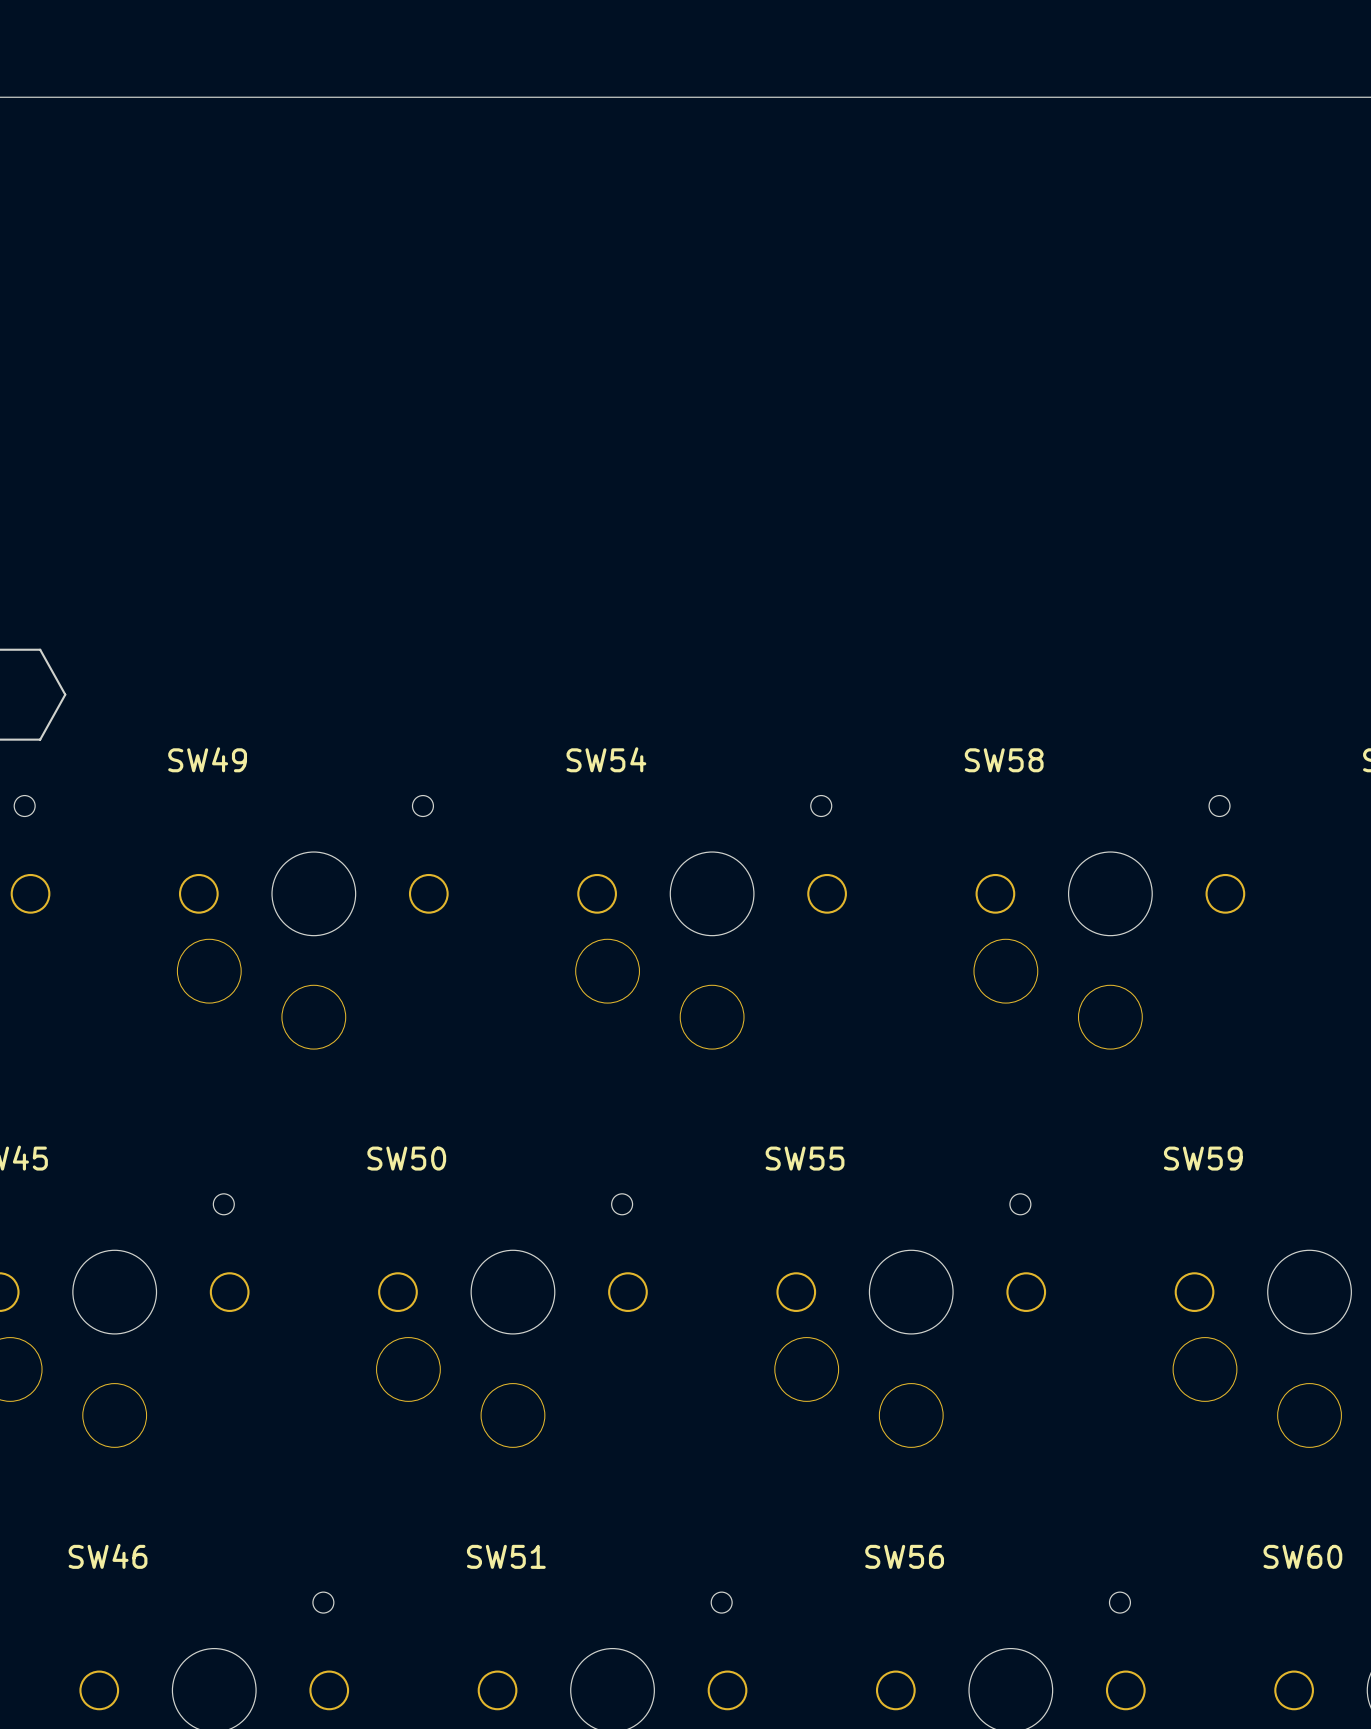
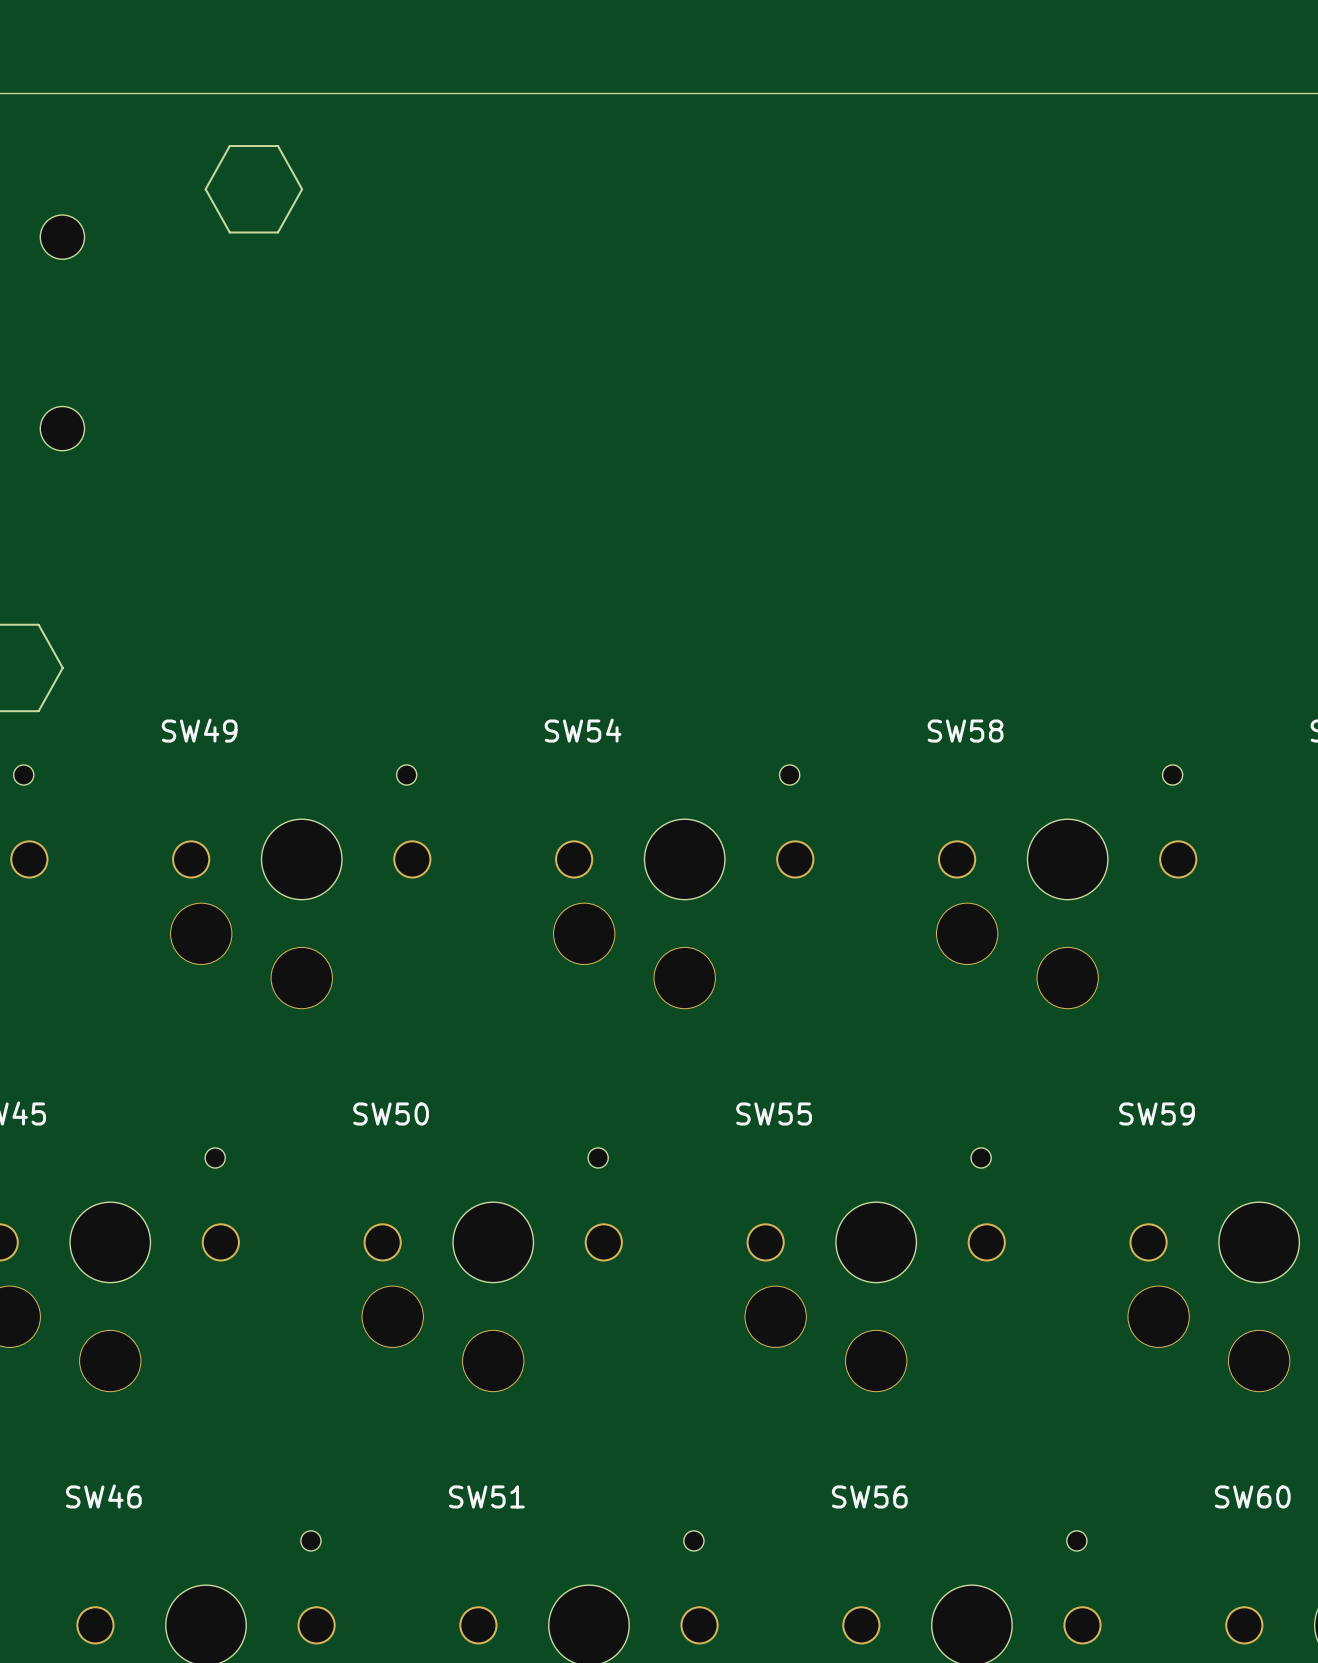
drawing: none -> [204, 145, 304, 234]
part: none -> (62, 237)
part: none -> (62, 428)

